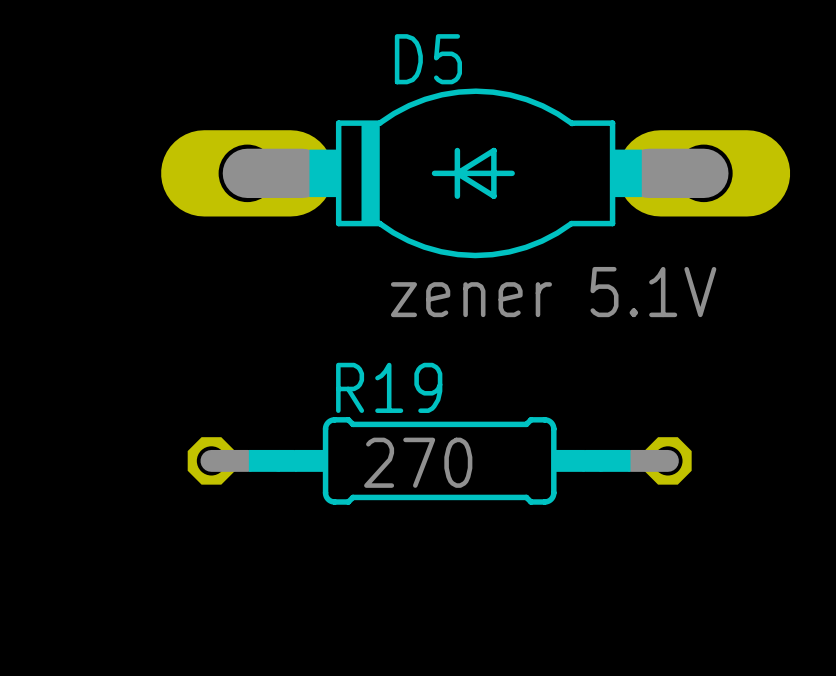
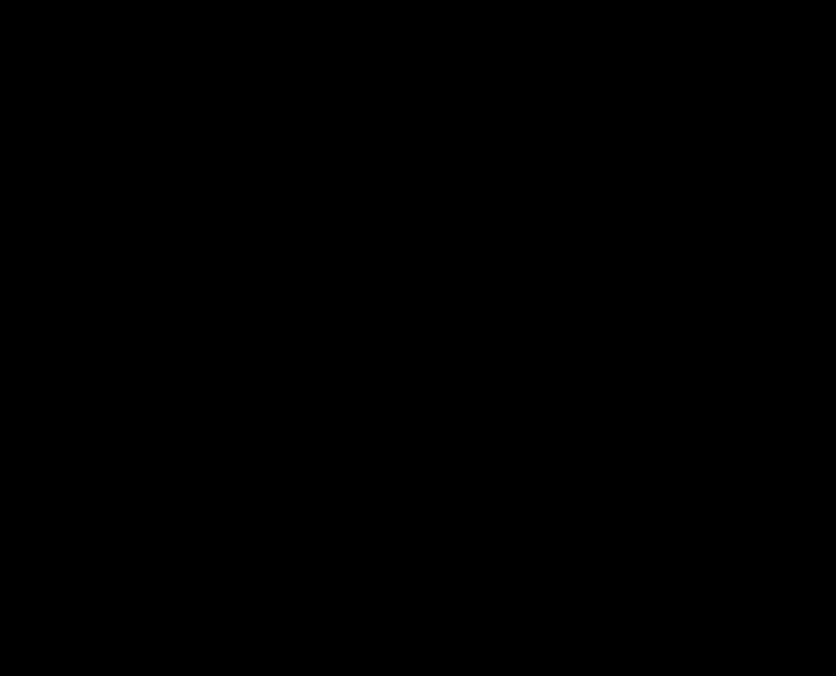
D5: zener 5.1V (475, 173) -> none
R19: 270 (439, 460) -> none

